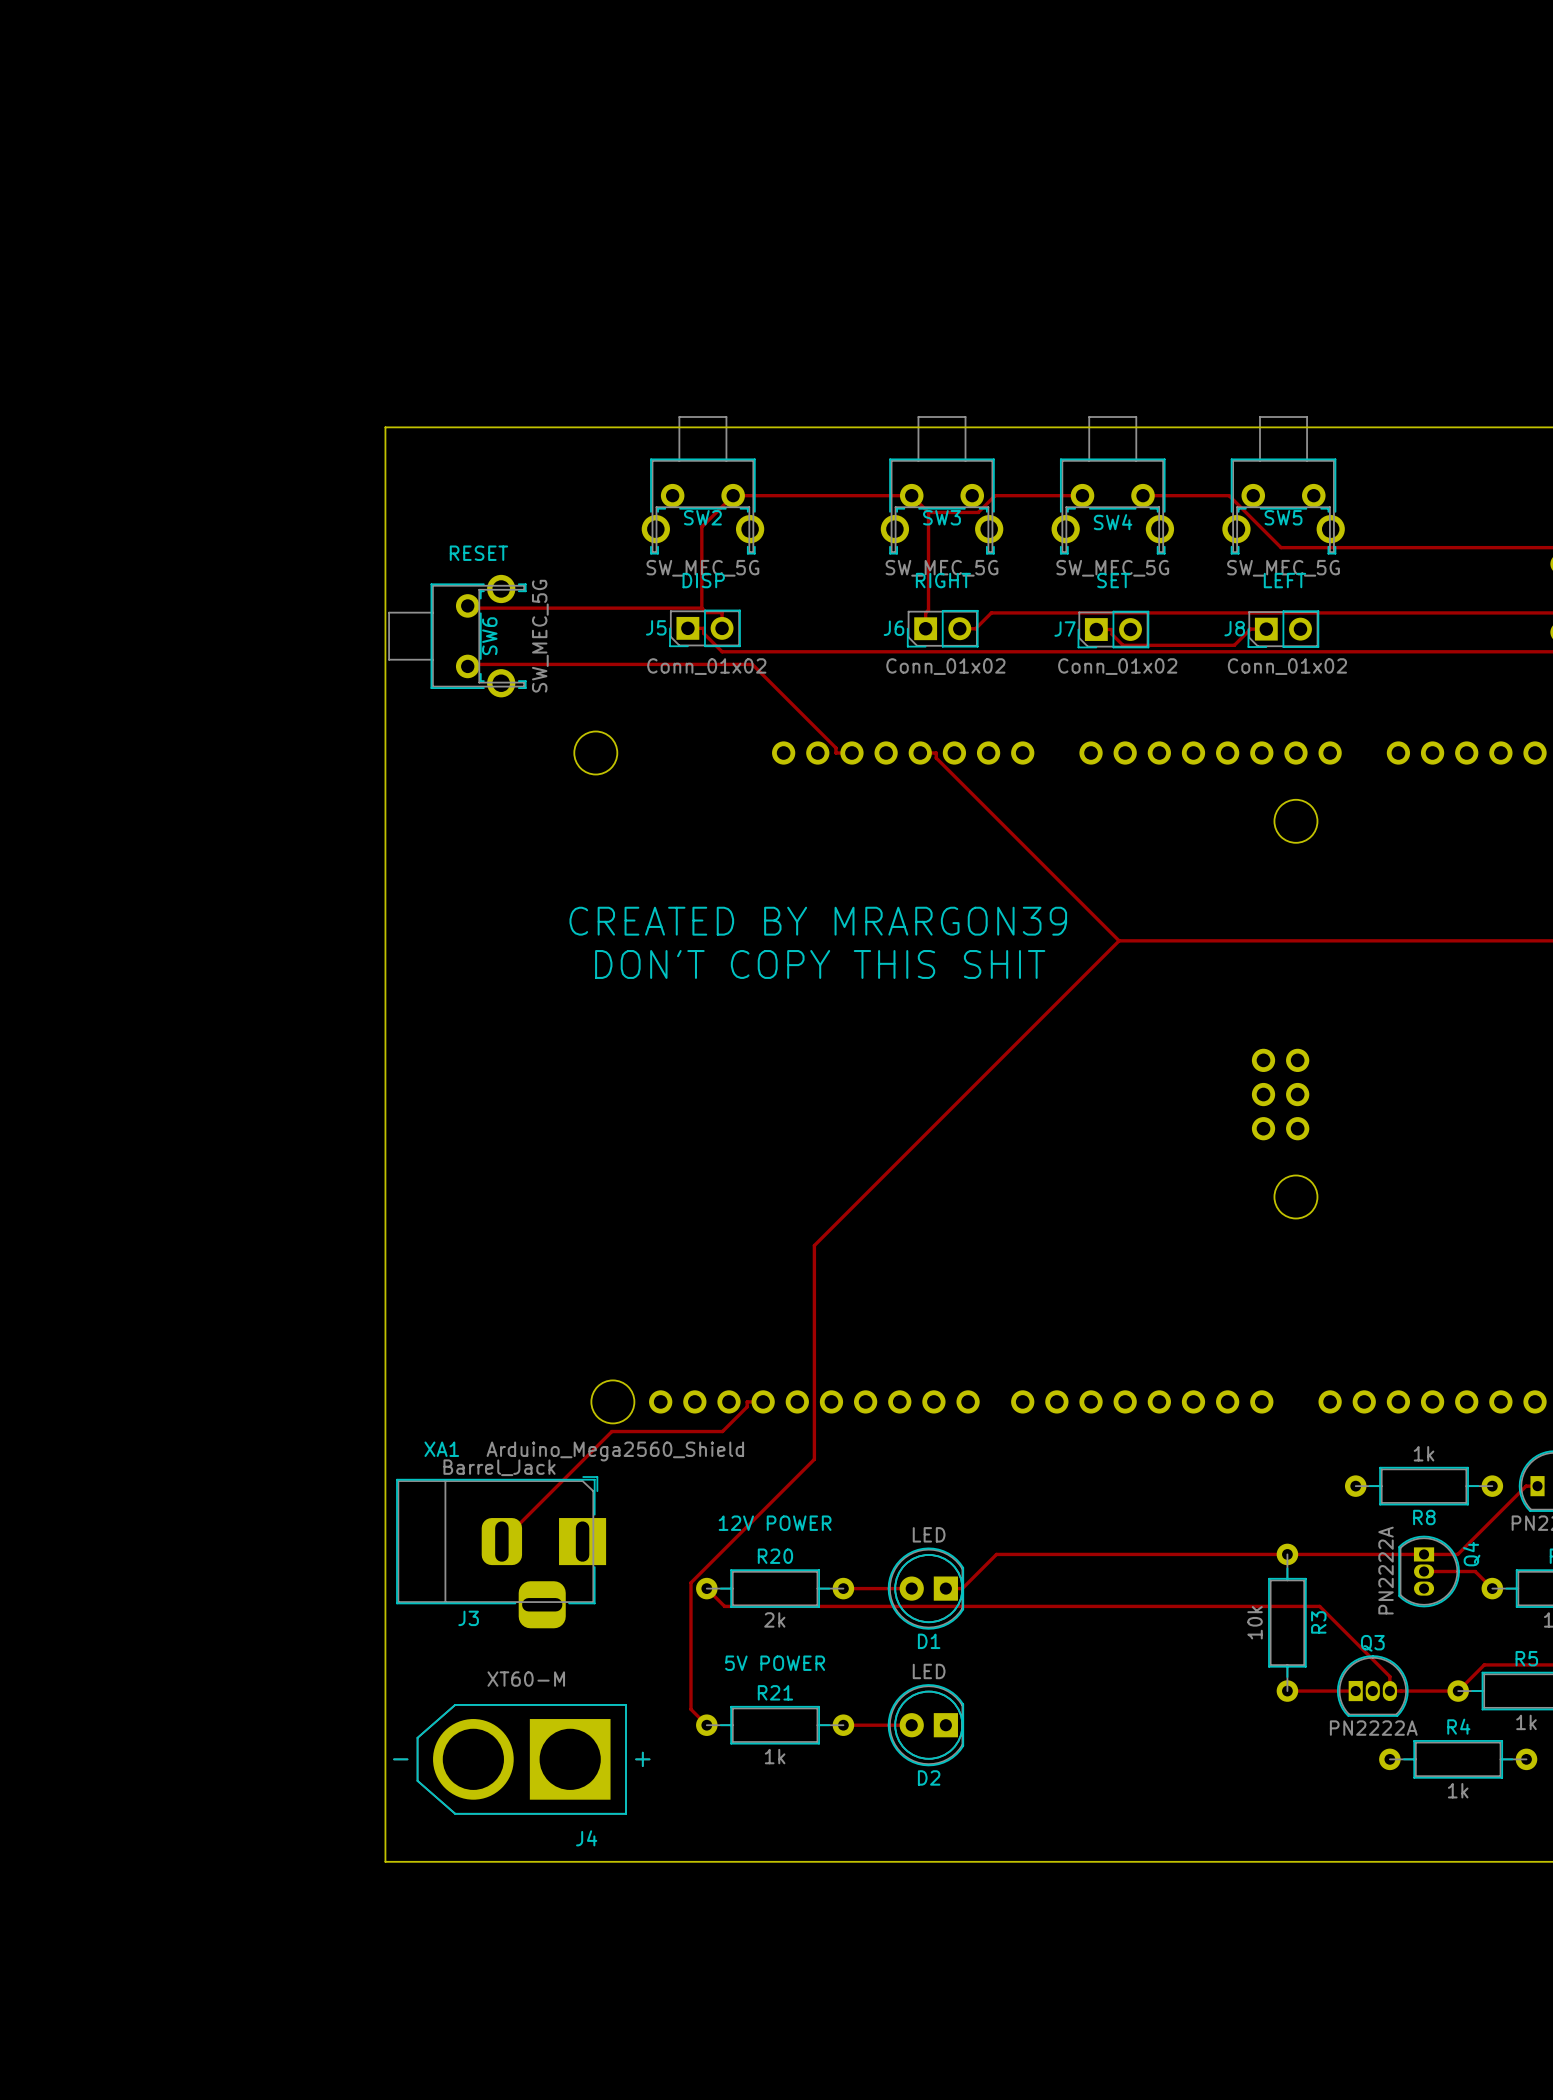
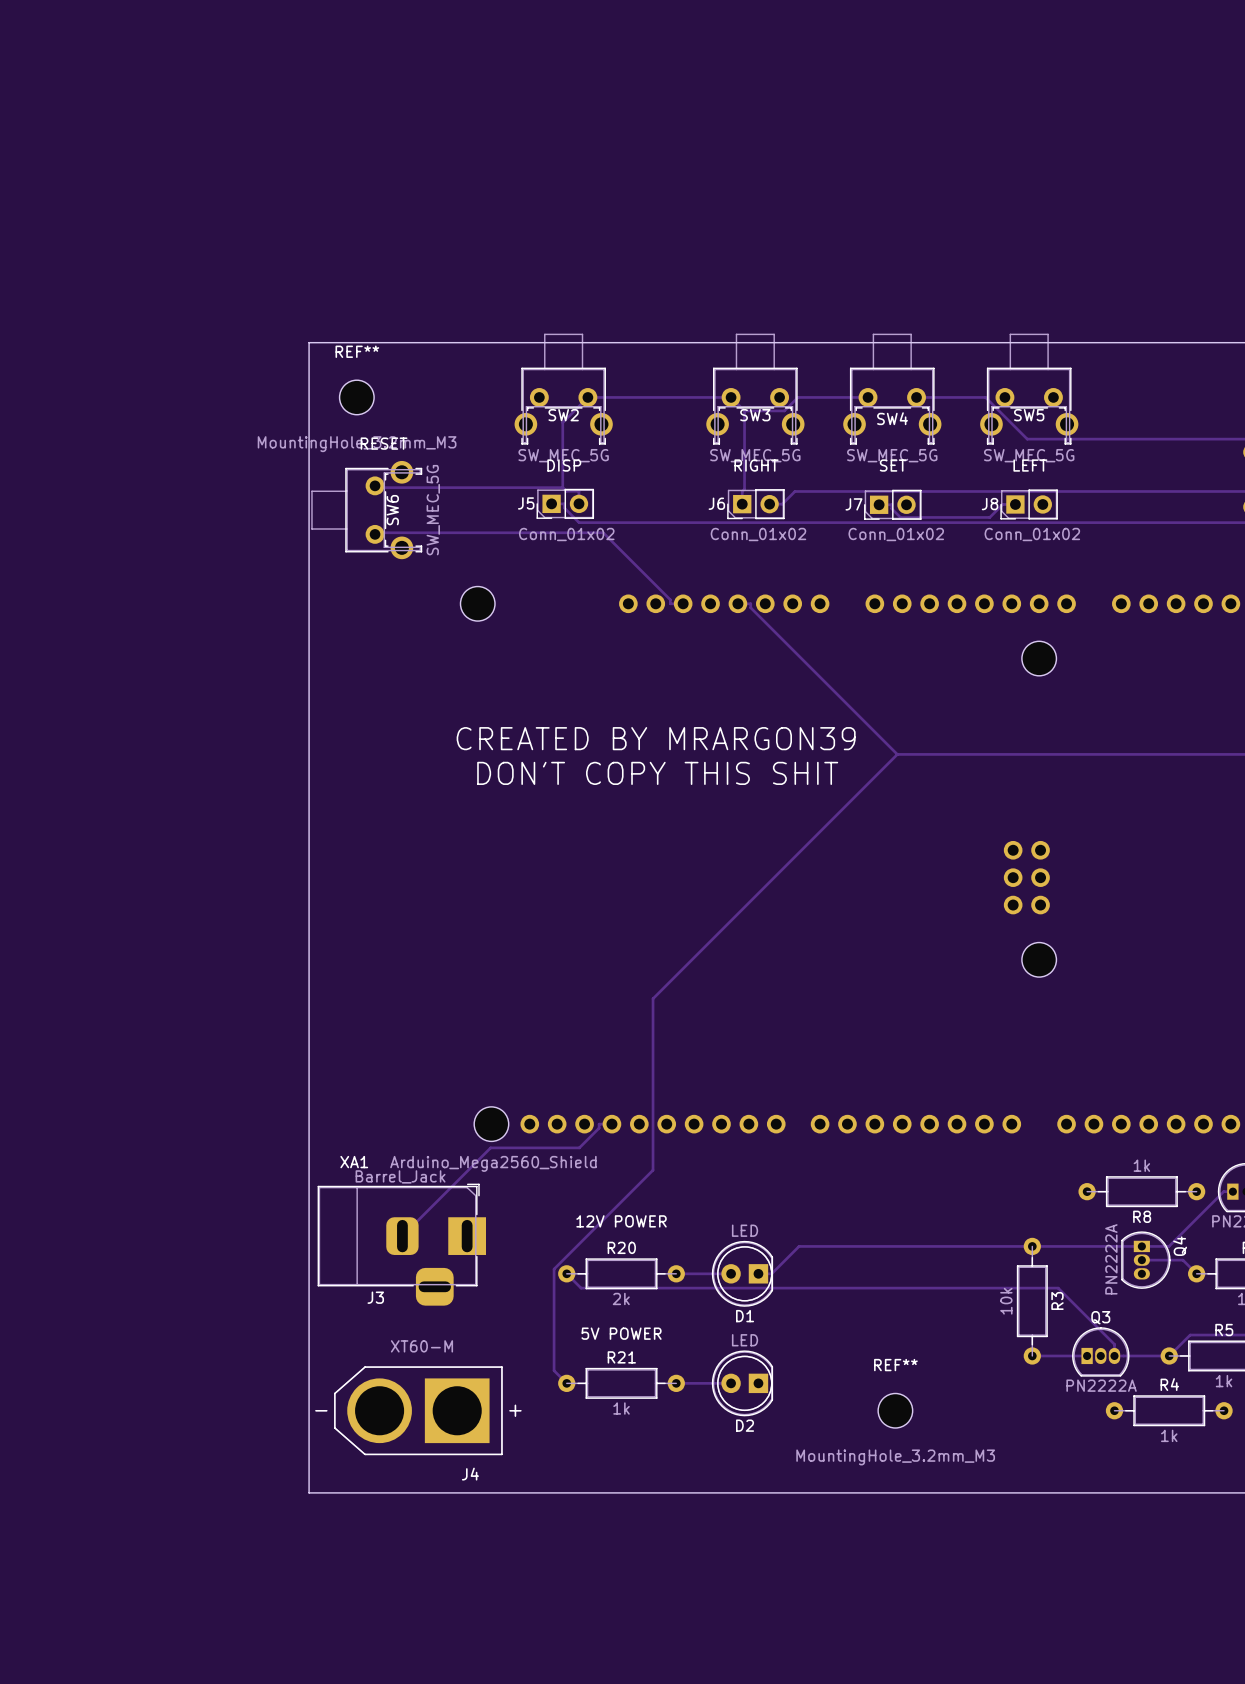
REF**: none -> MountingHole_3.2mm_M3 (356, 397)
REF**: none -> MountingHole_3.2mm_M3 (895, 1410)

